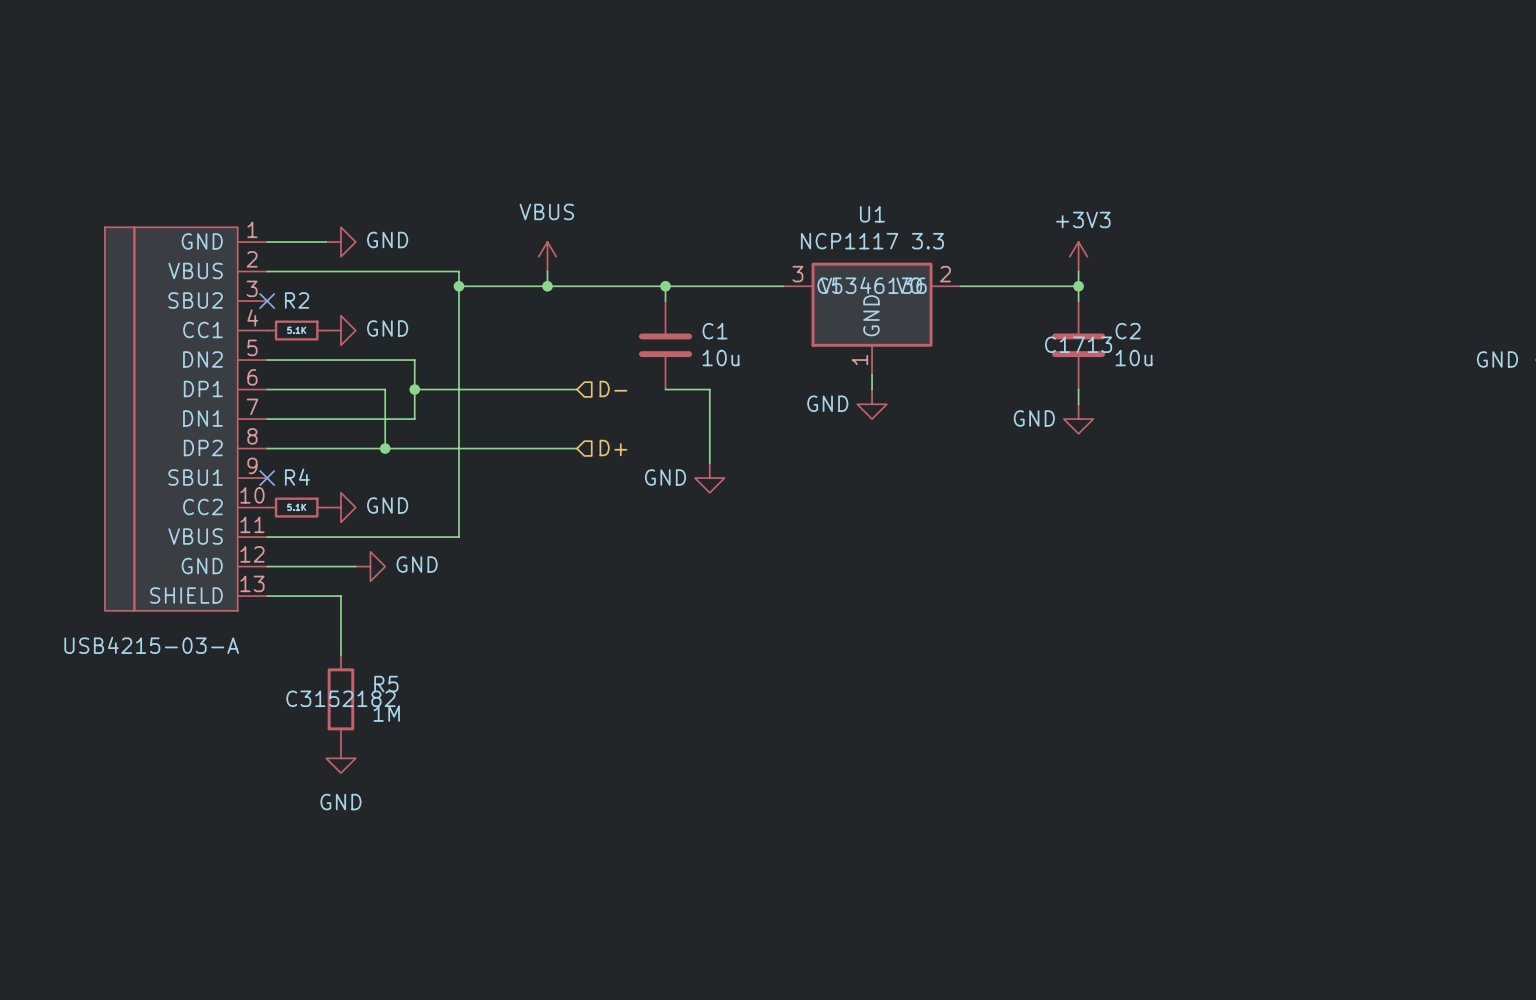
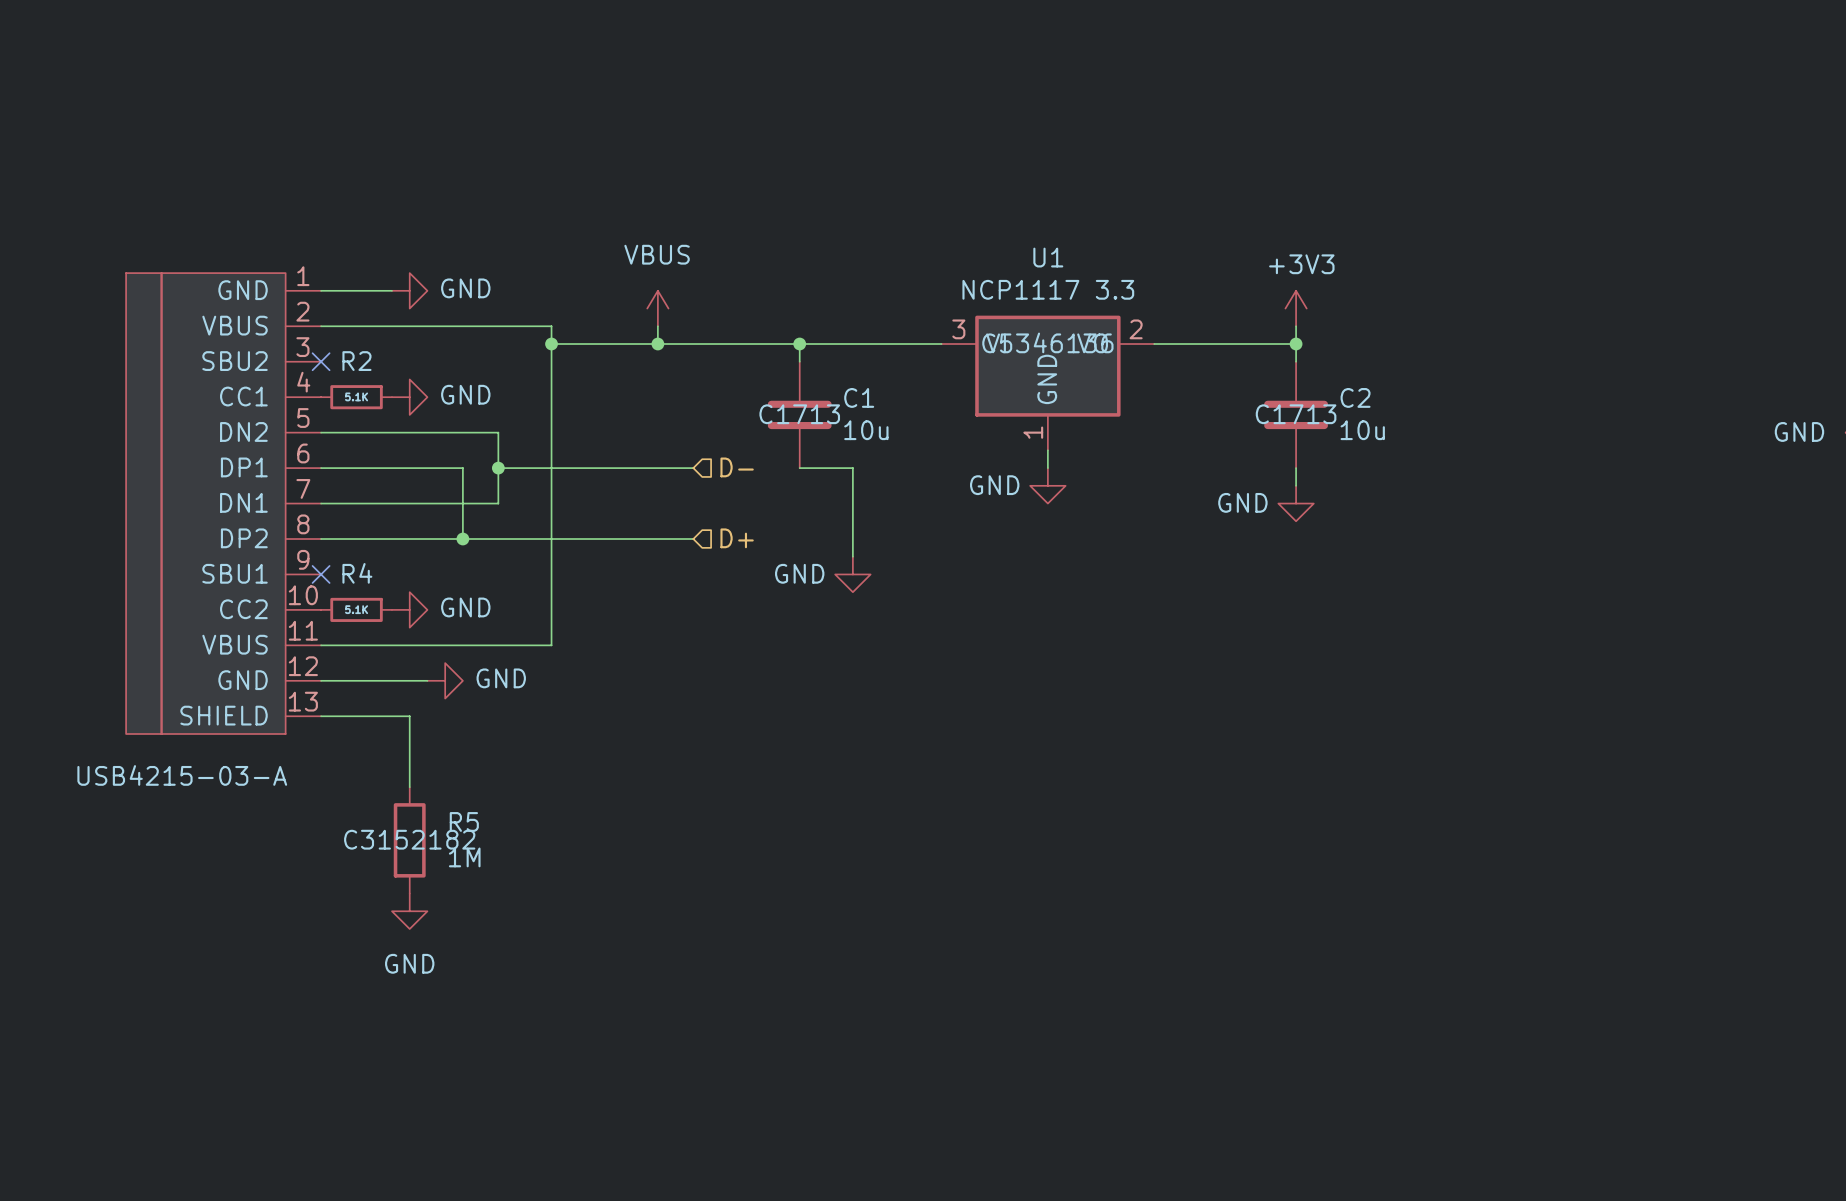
C1 text: none -> C1713 (799, 414)

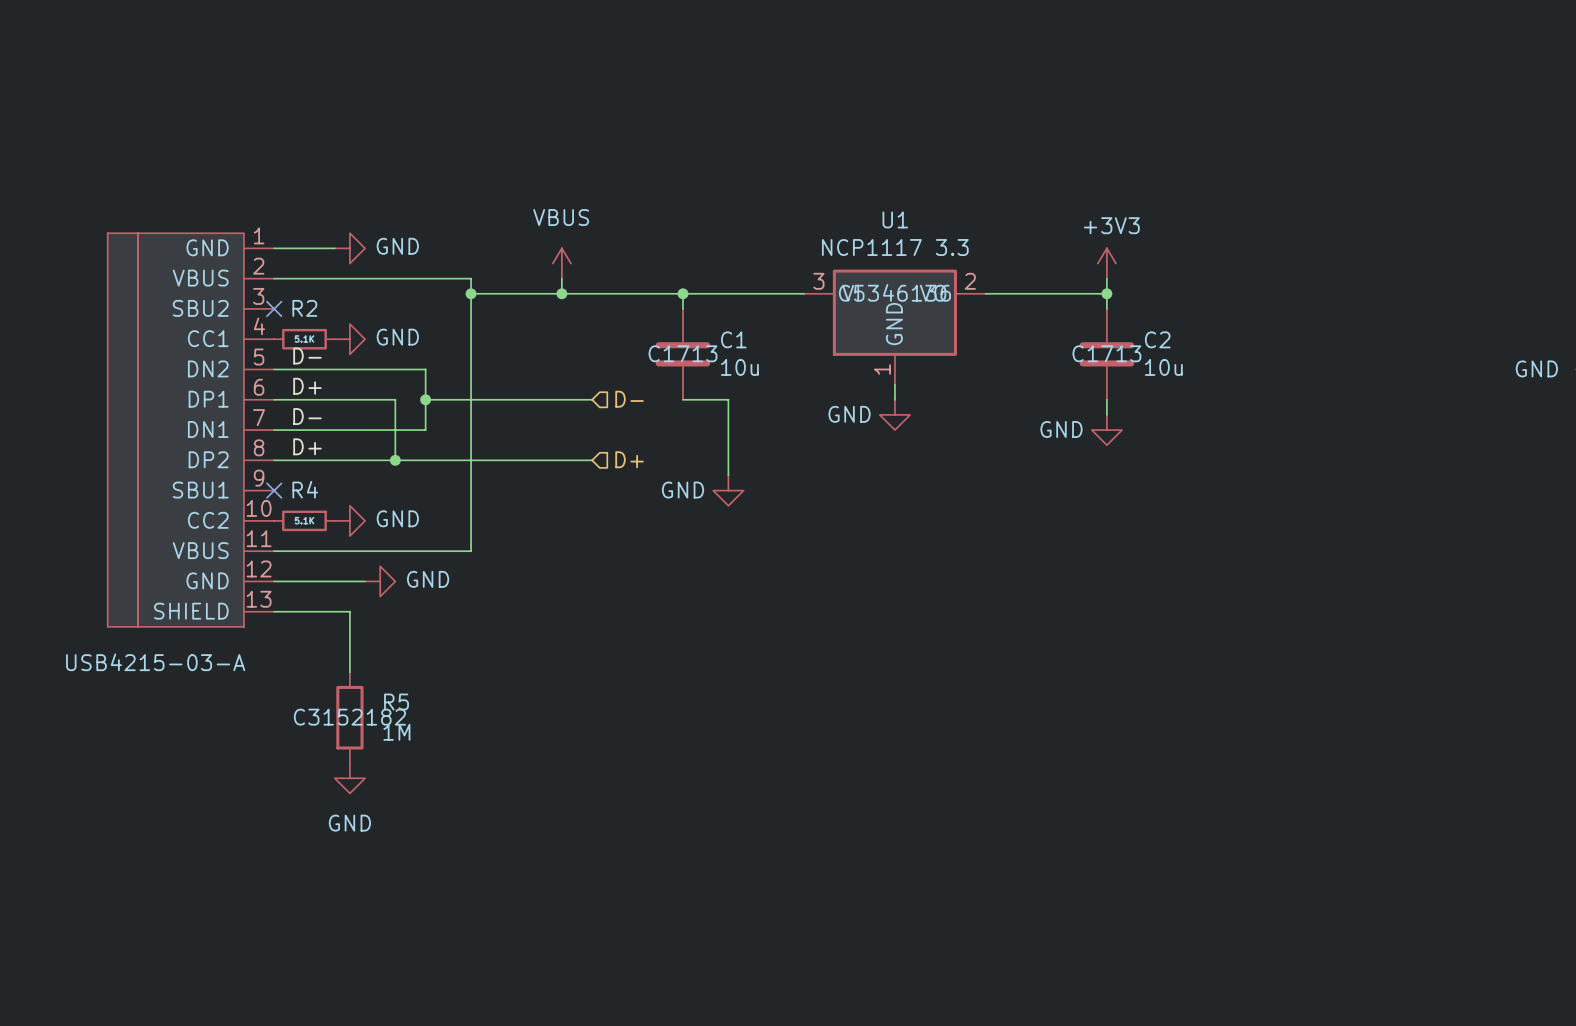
label: none -> D- (307, 355)
label: none -> D+ (307, 386)
label: none -> D- (307, 416)
label: none -> D+ (307, 446)

